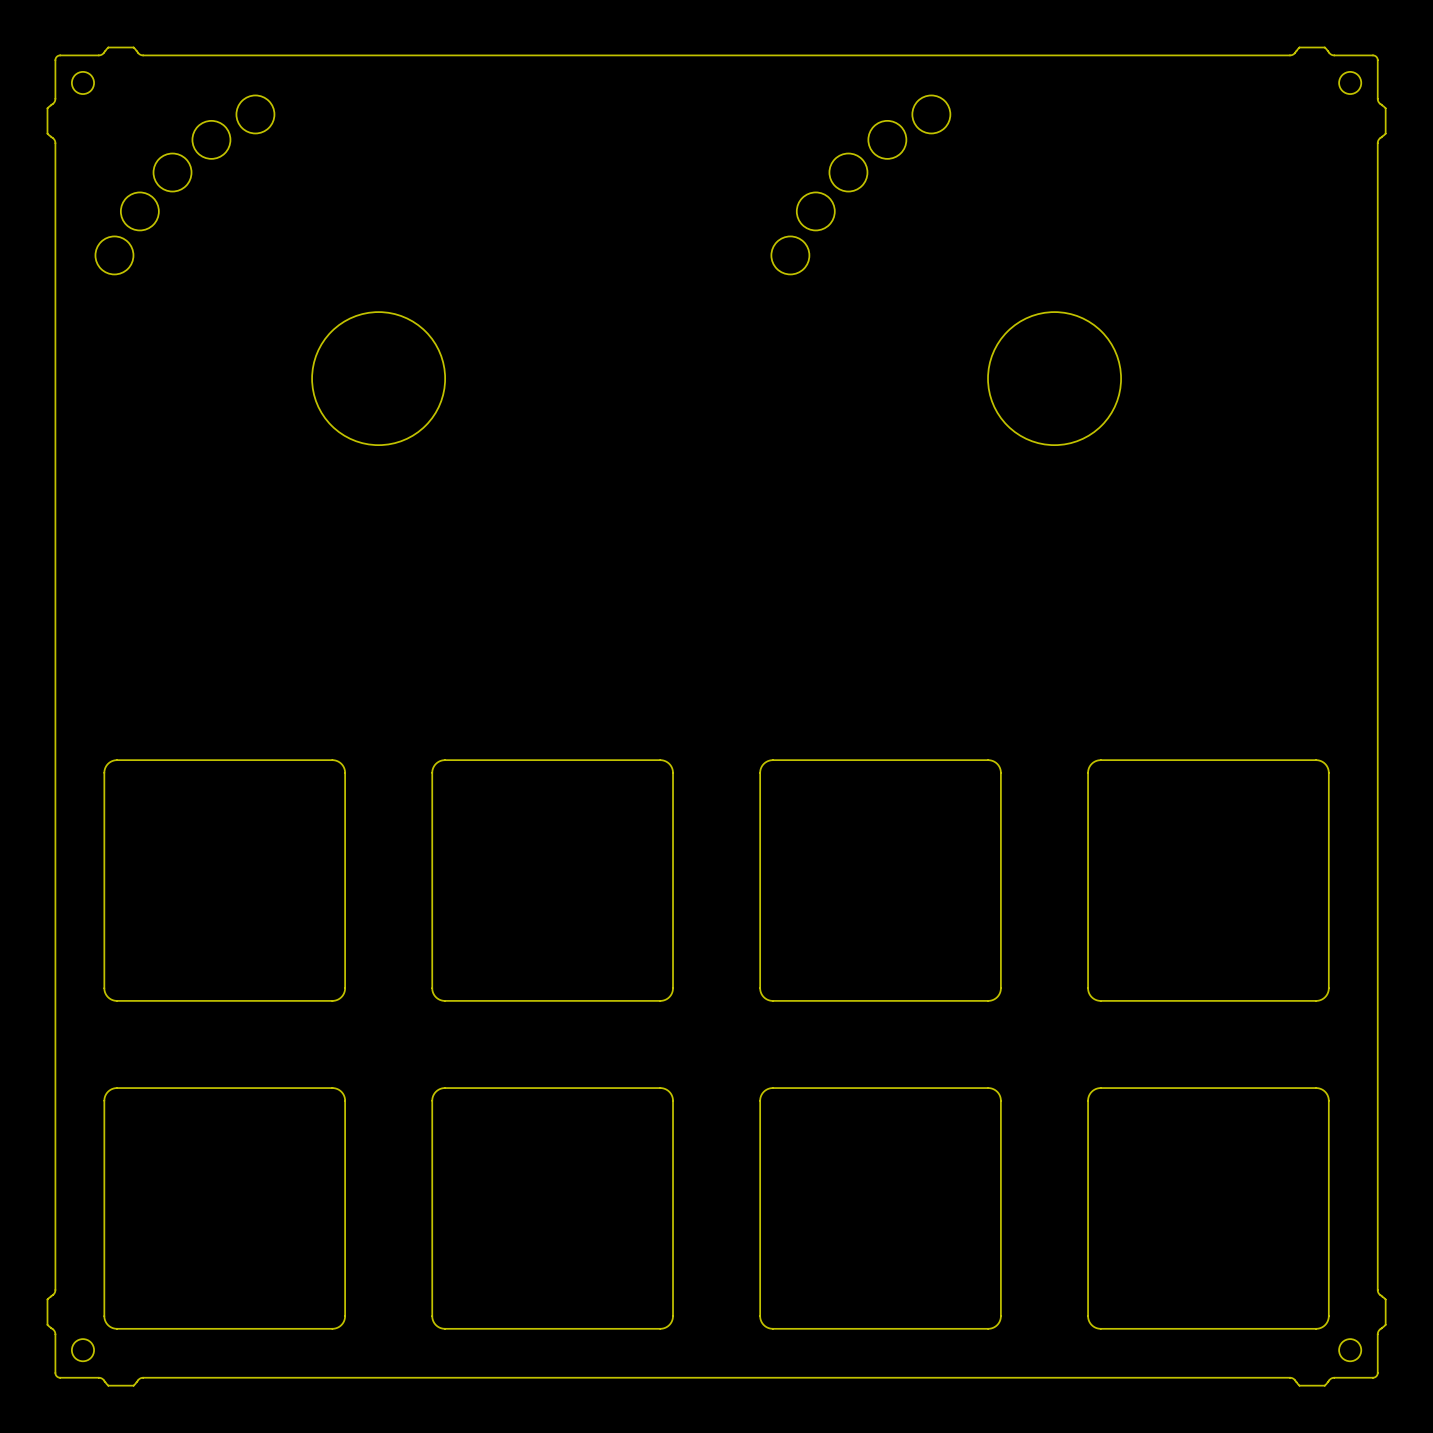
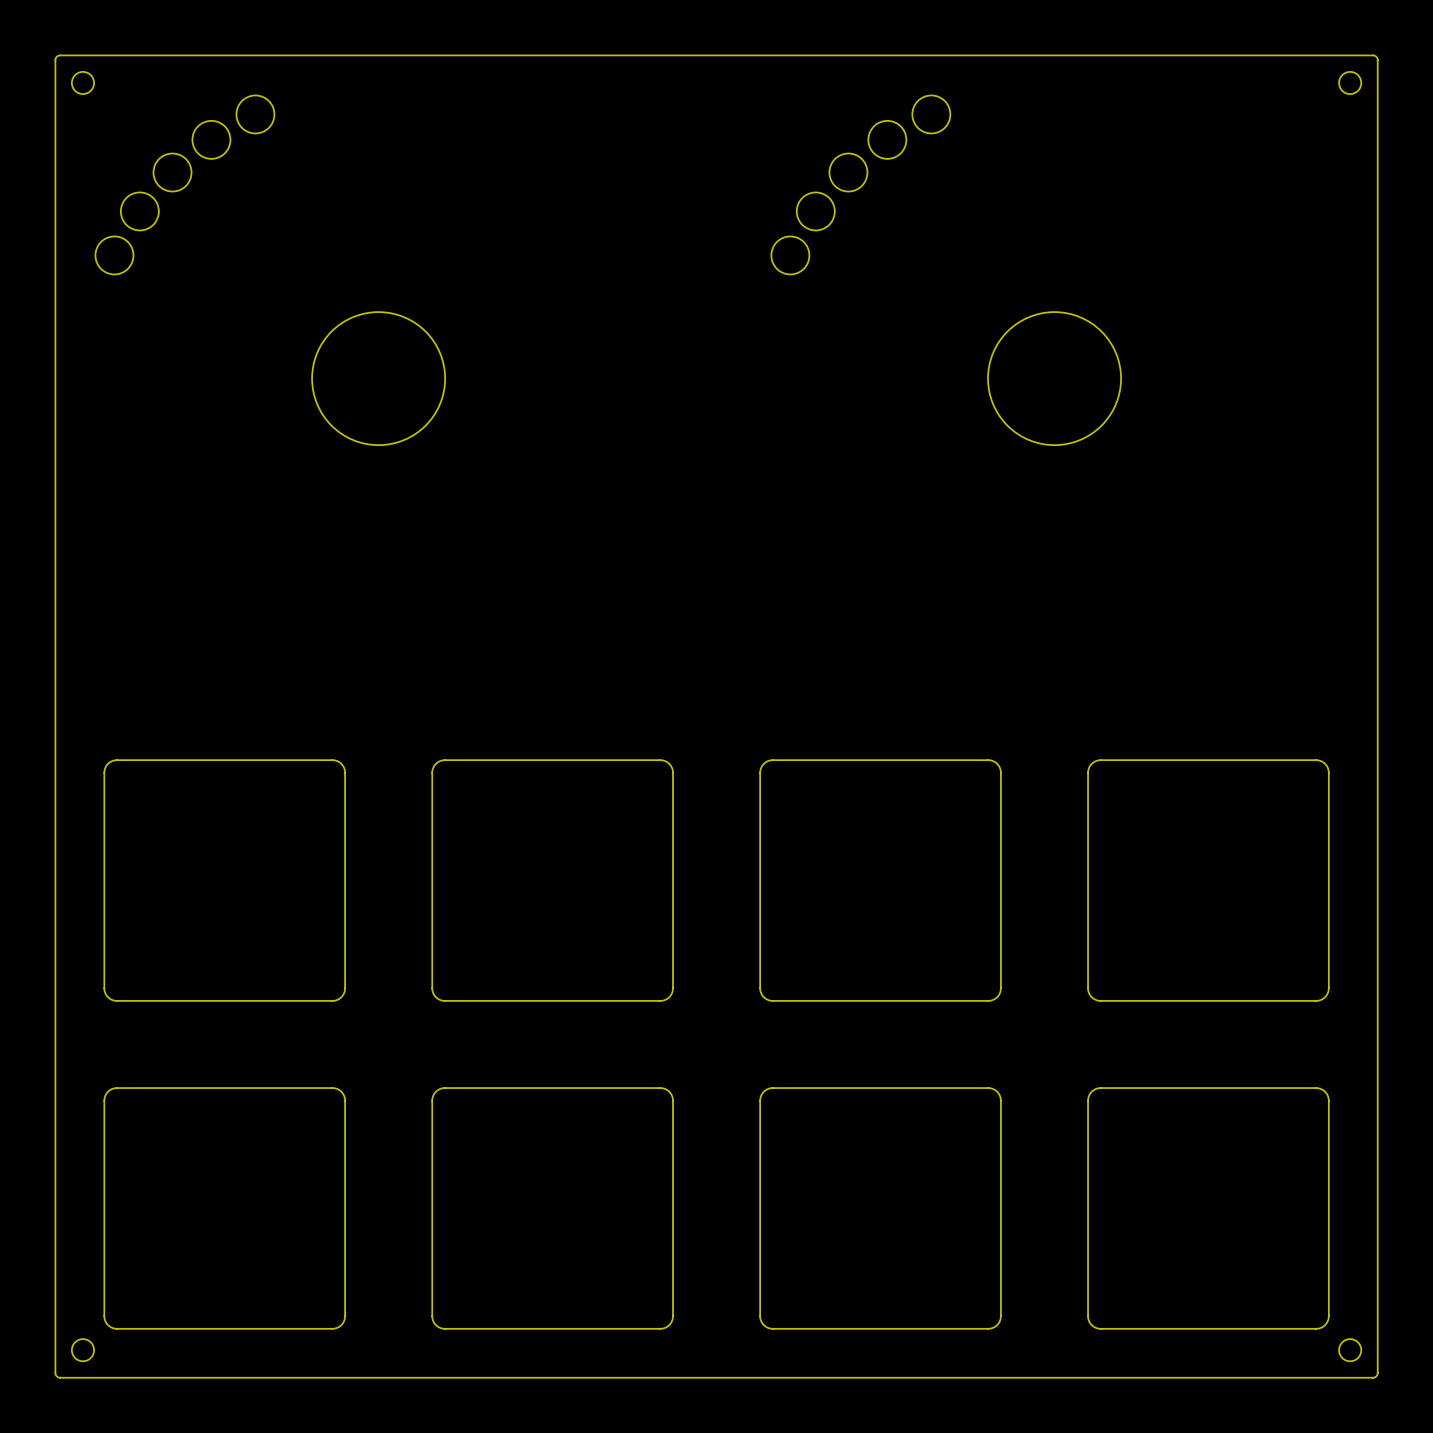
drawing shape: [47, 47, 1386, 1386] -> [55, 55, 1379, 1379]

